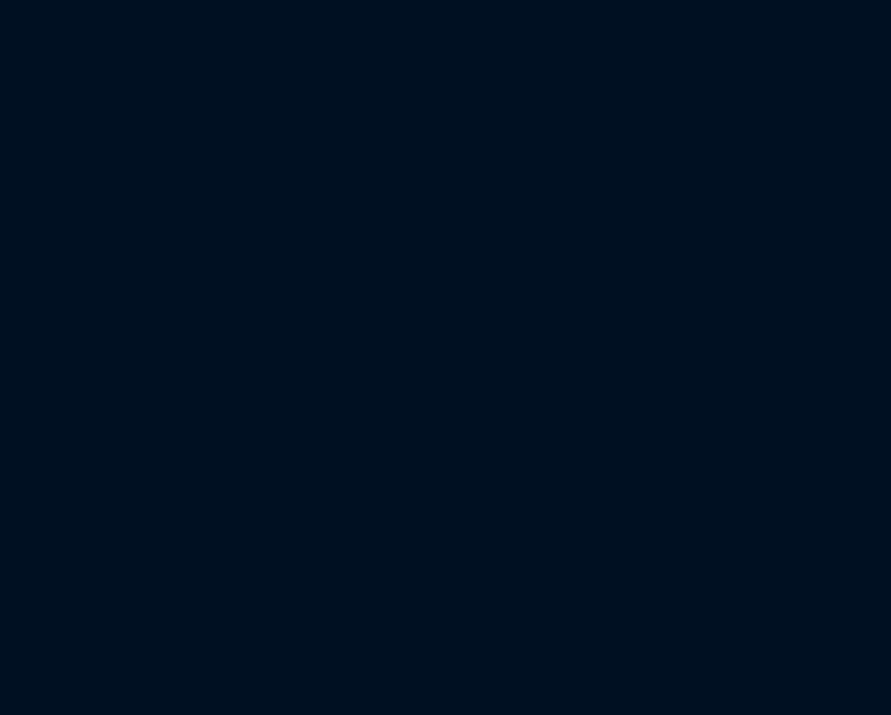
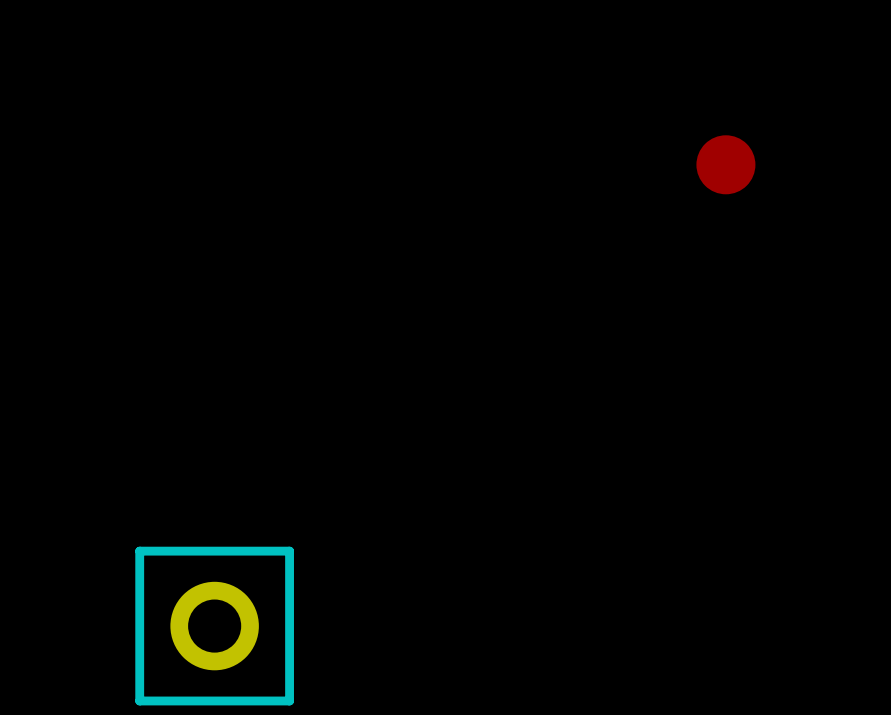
part: none -> (725, 164)
part: none -> (214, 626)

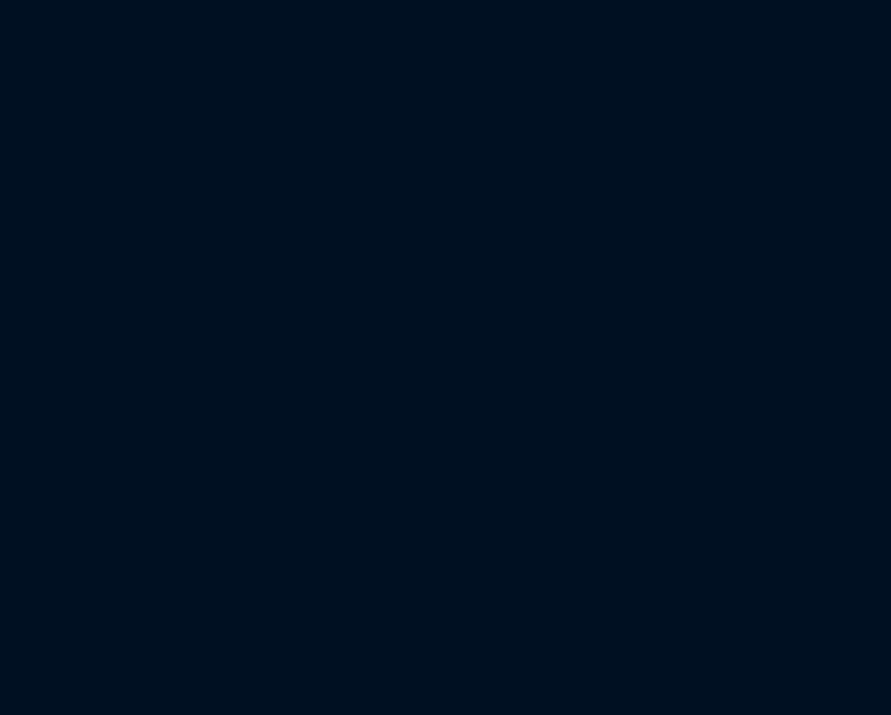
part: (725, 164) -> none
part: (214, 626) -> none

